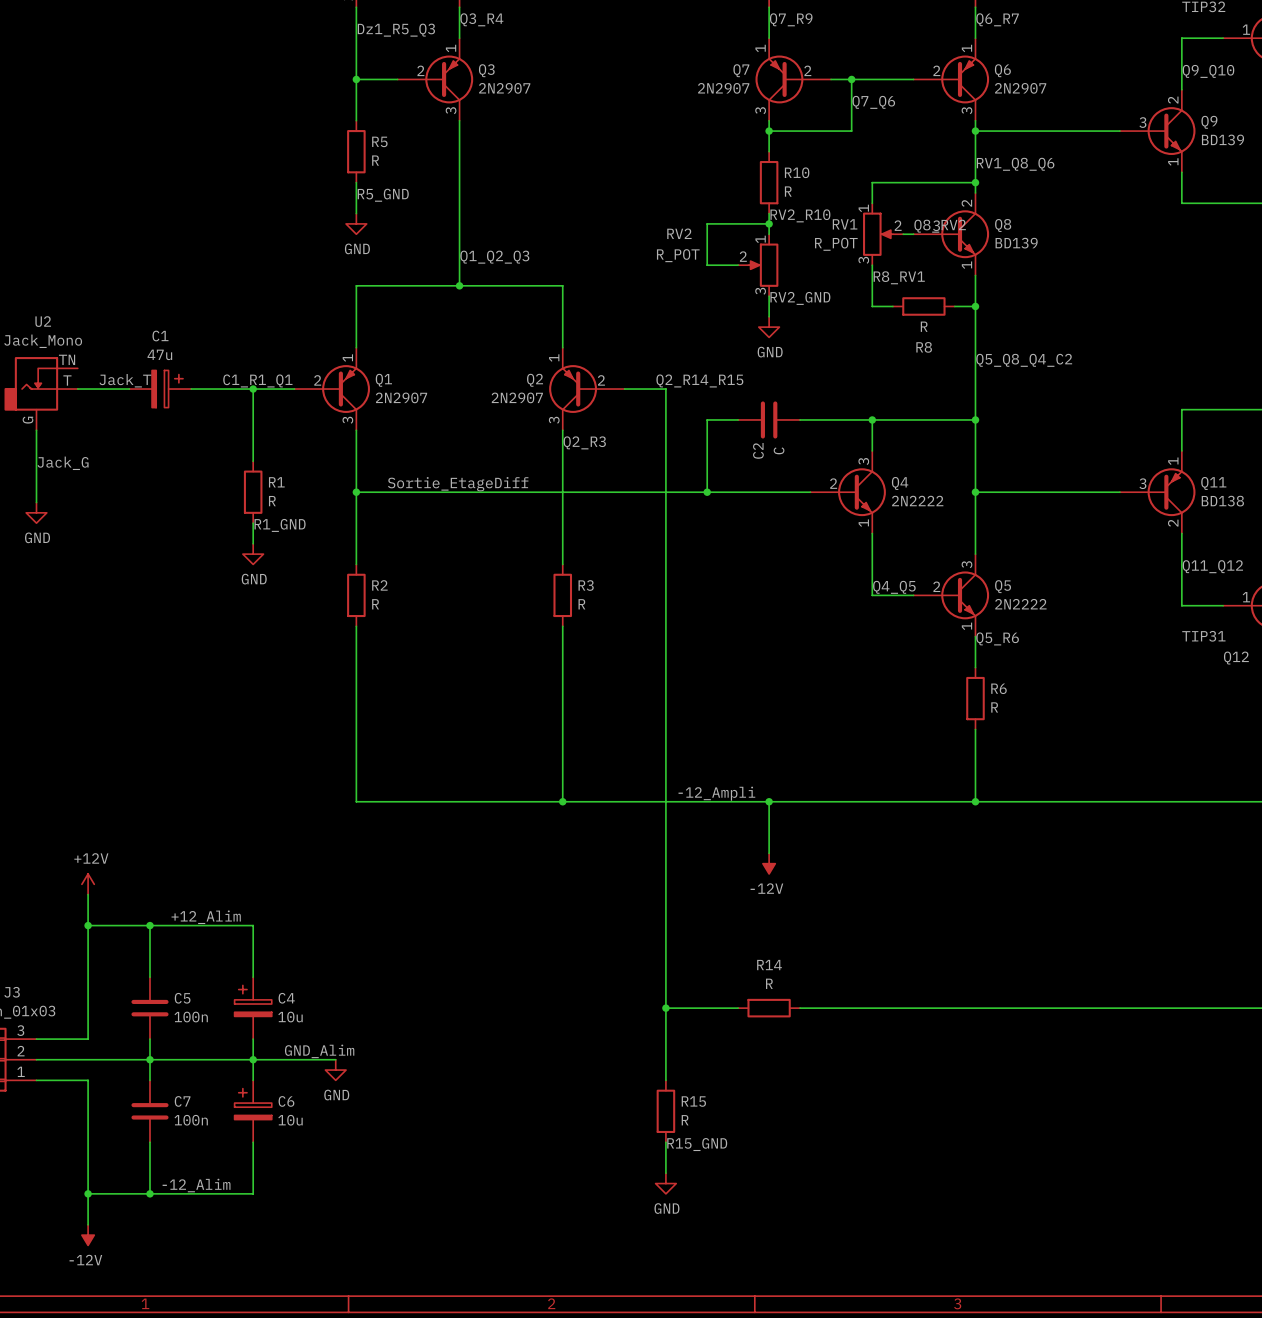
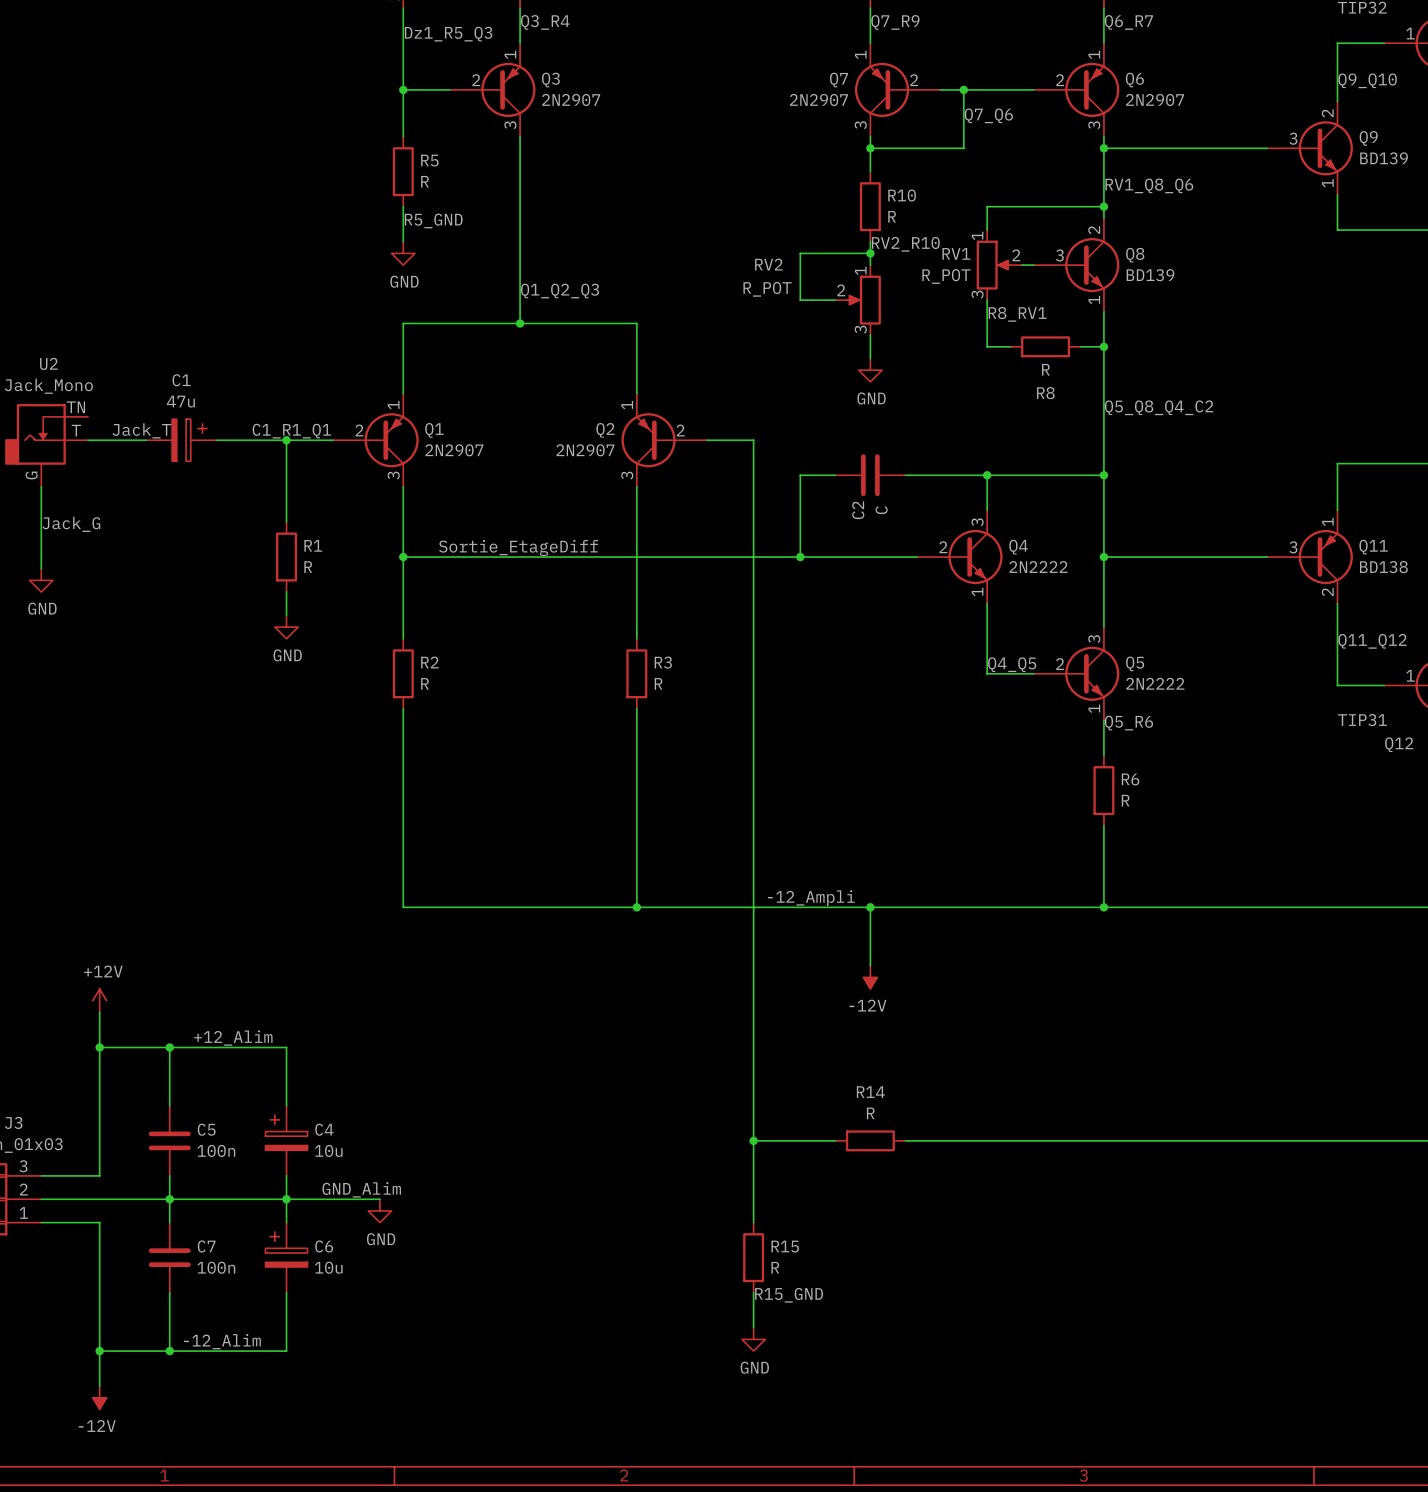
label: Q8_RV2 (940, 226) -> none
label: RV2_GND (800, 298) -> none
label: Q2_R14_R15 (699, 380) -> none
label: Q2_R3 (584, 442) -> none
label: R1_GND (280, 525) -> none

